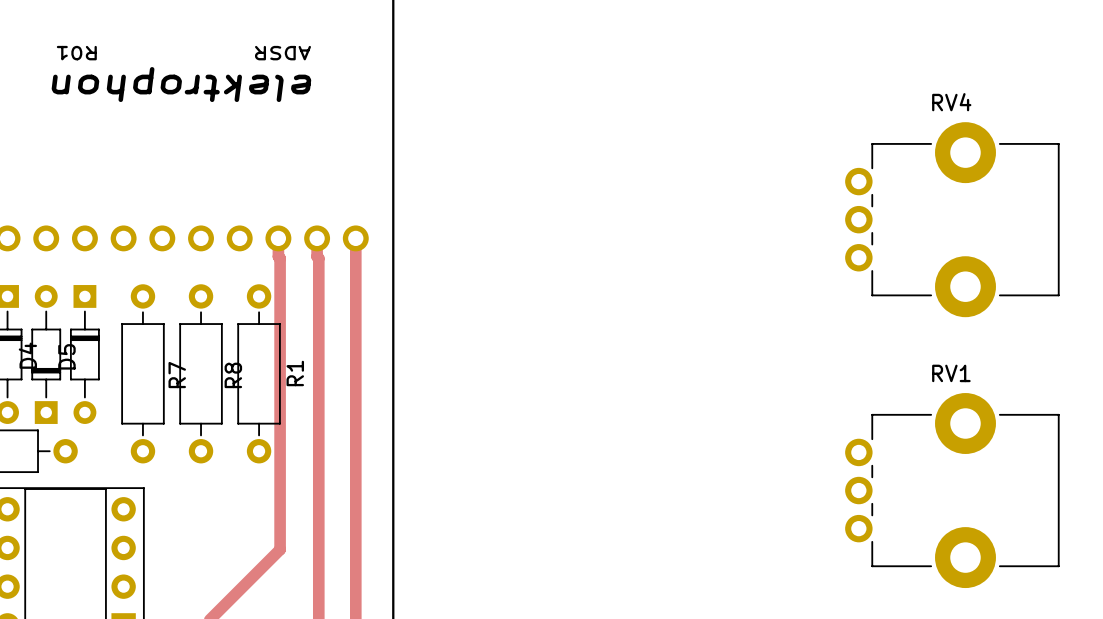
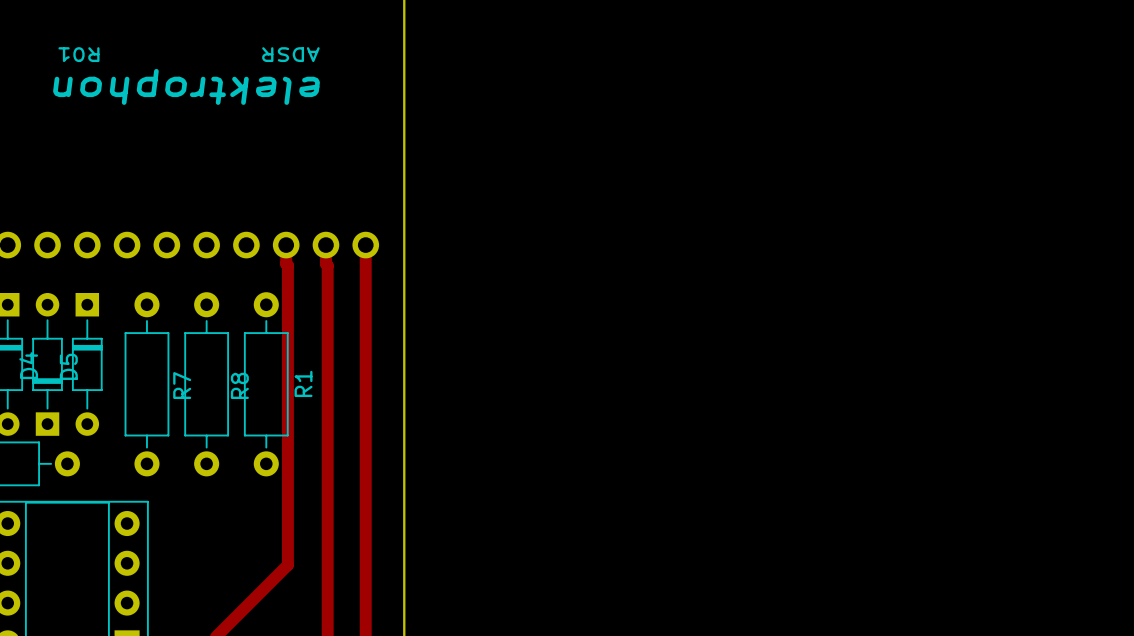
RV4: (952, 219) -> none
RV1: (952, 490) -> none

